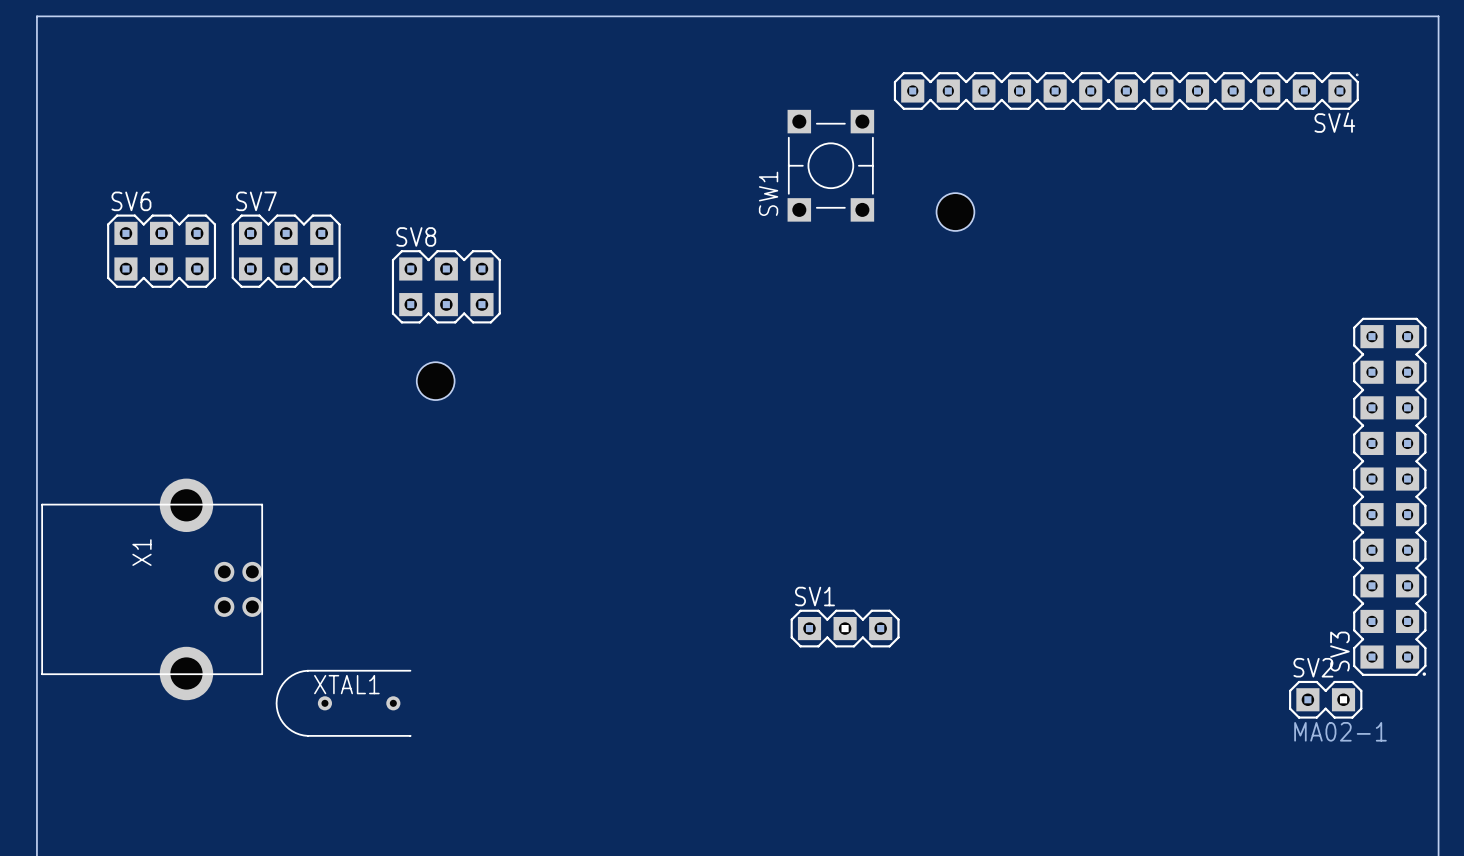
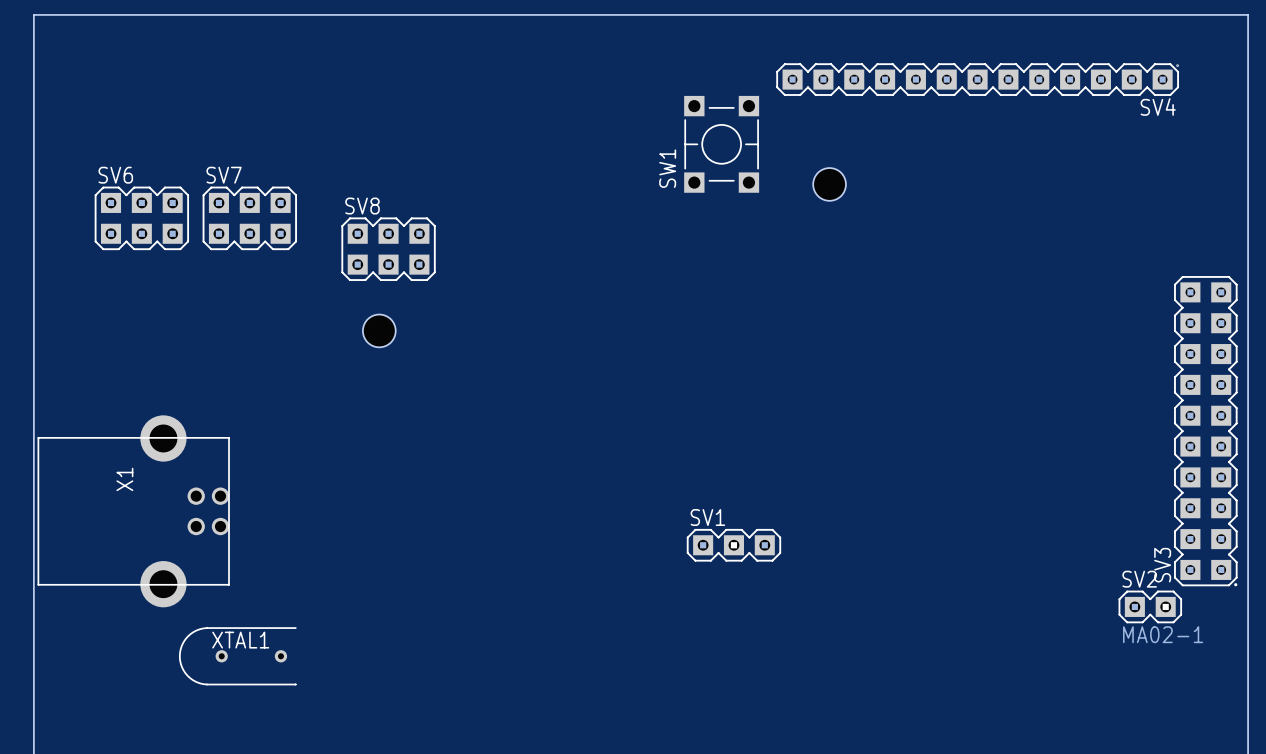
XTAL1 position: (343, 703) -> (237, 656)

